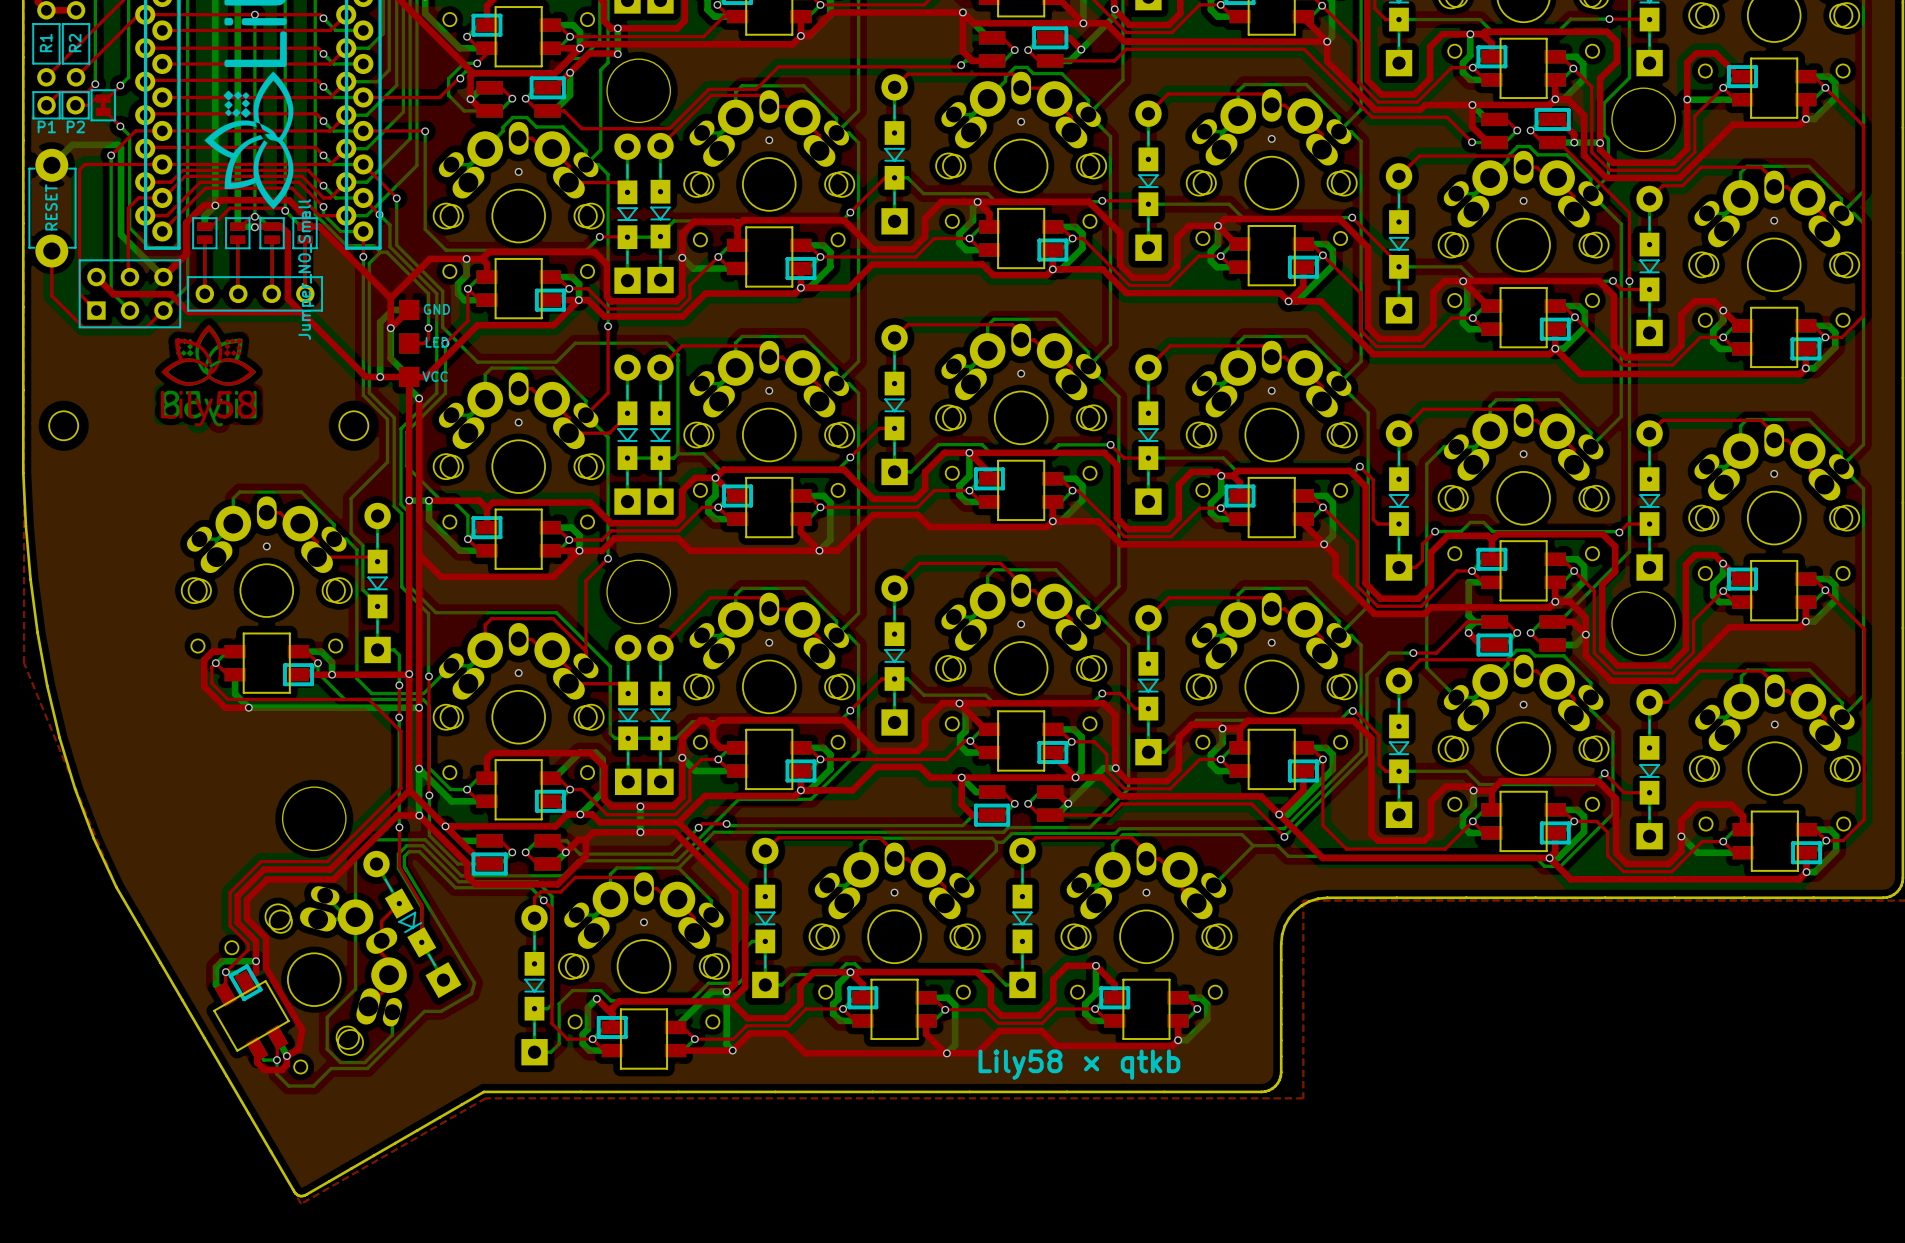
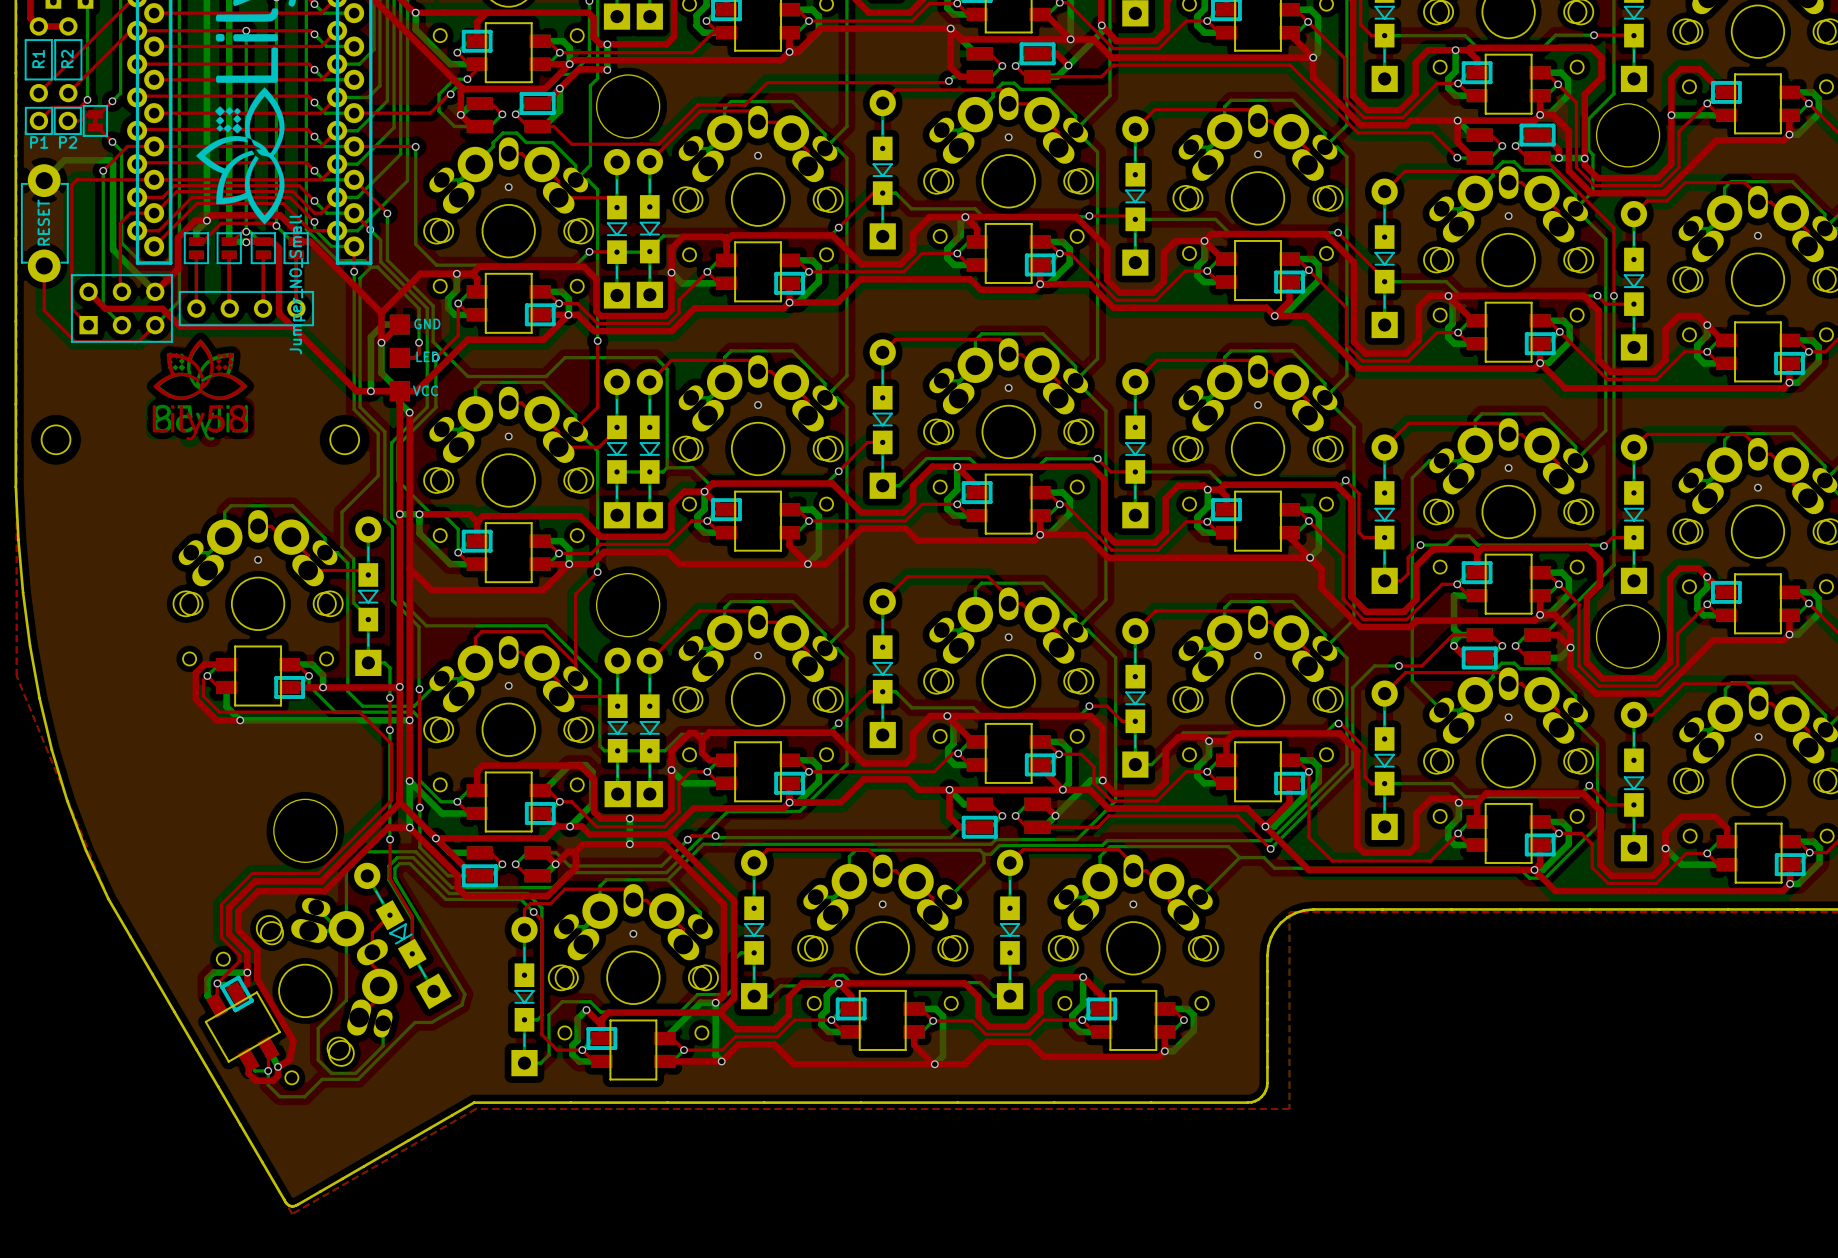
text: Lily58 × qtkb (1079, 1064) -> none

